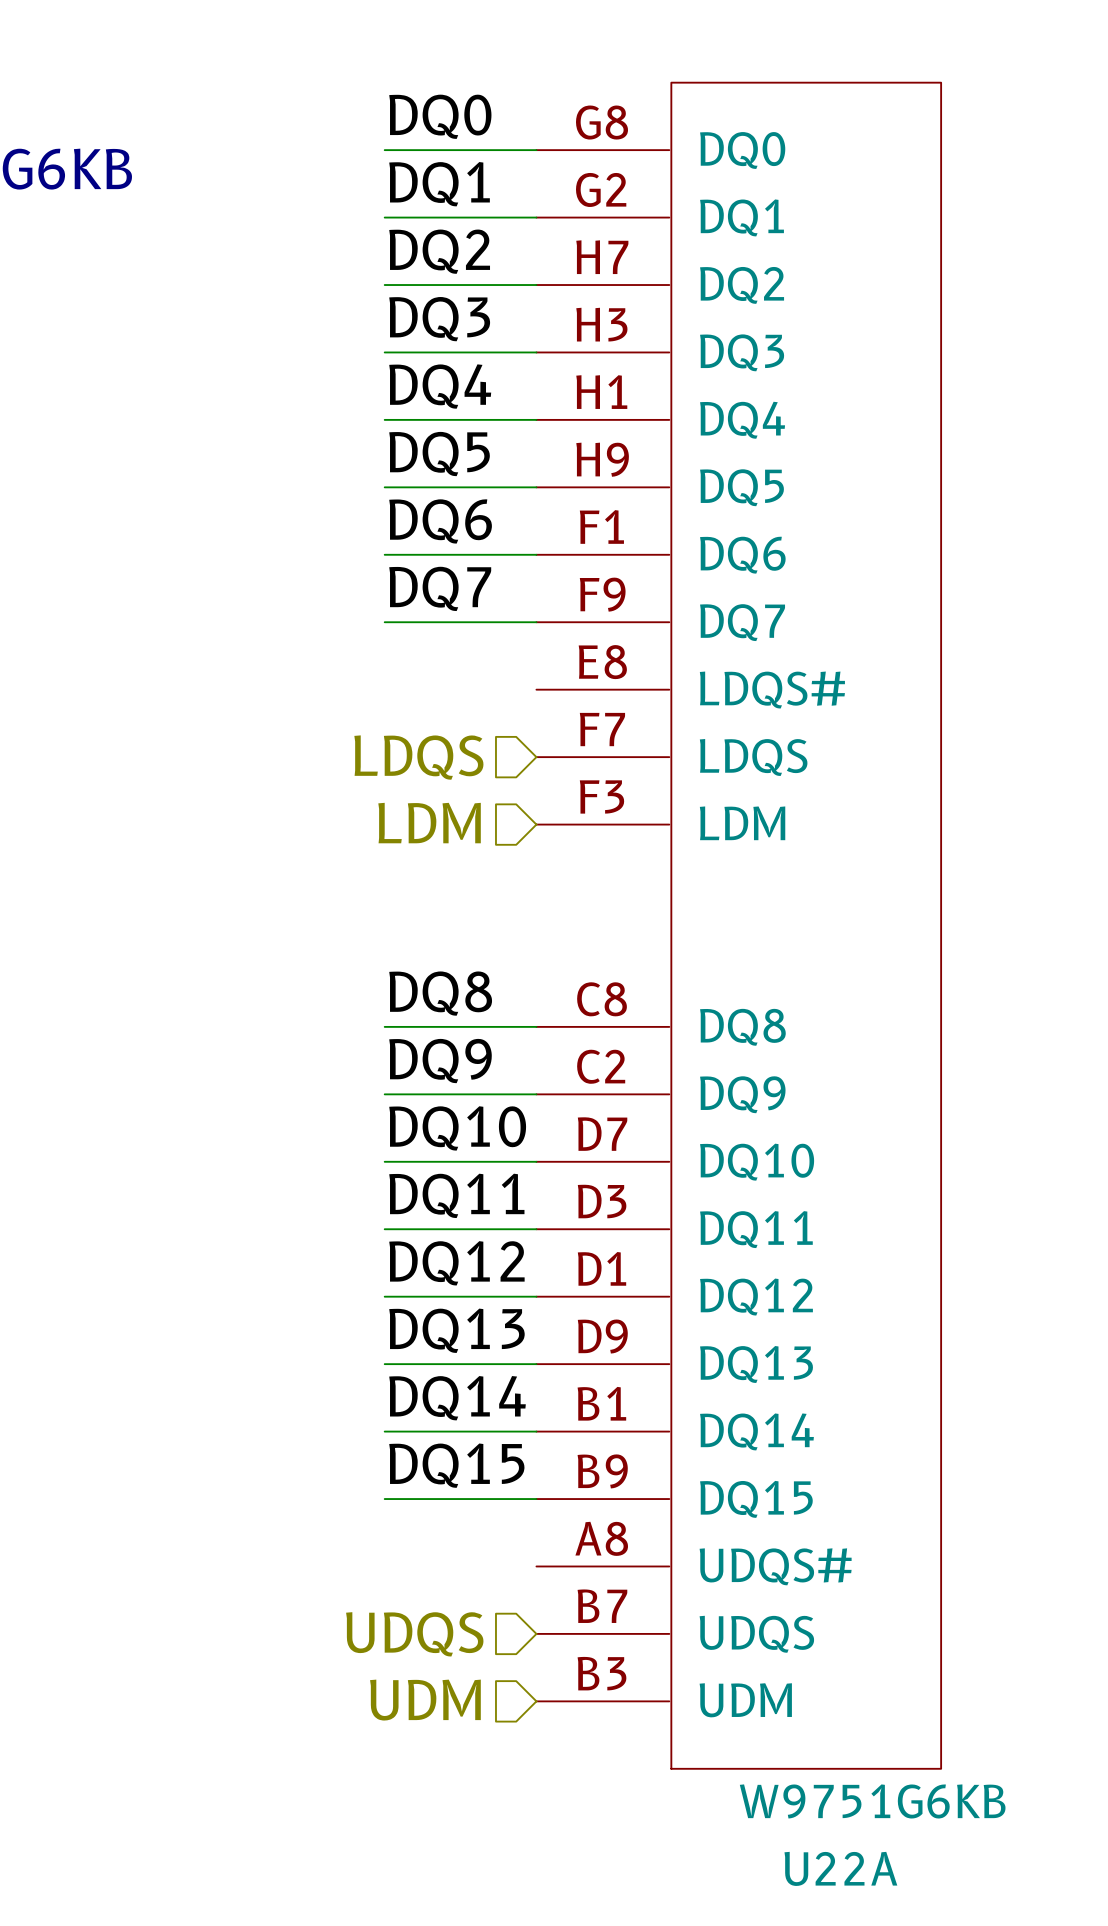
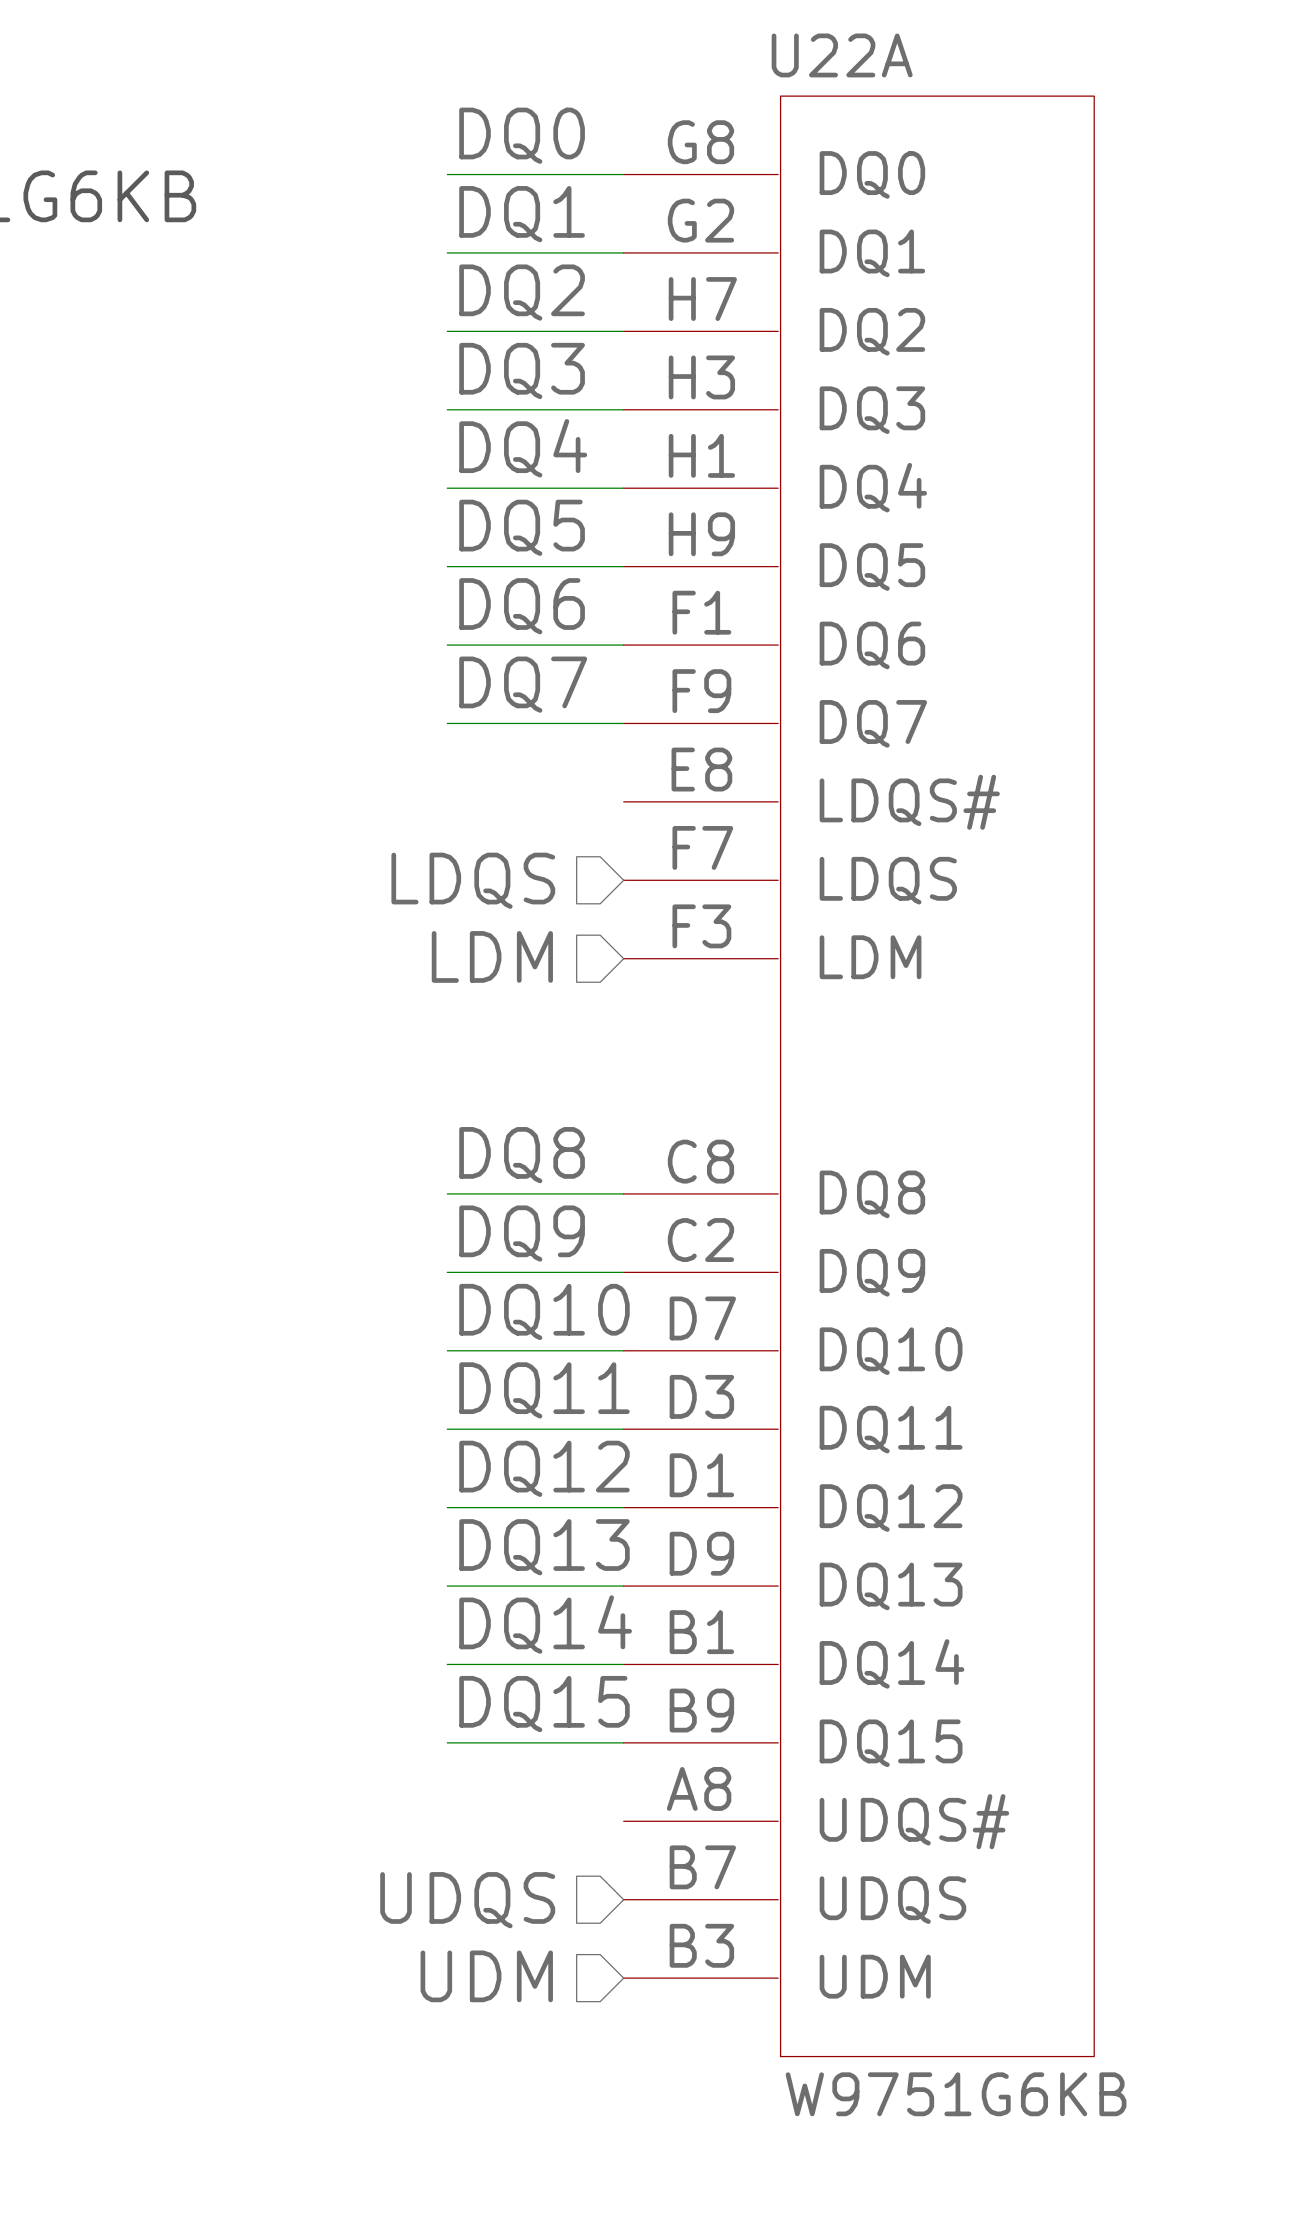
U22A value position: W9751G6KB (872, 1801) -> W9751G6KB (956, 2094)
U22A name position: U22A (840, 1868) -> U22A (842, 55)

